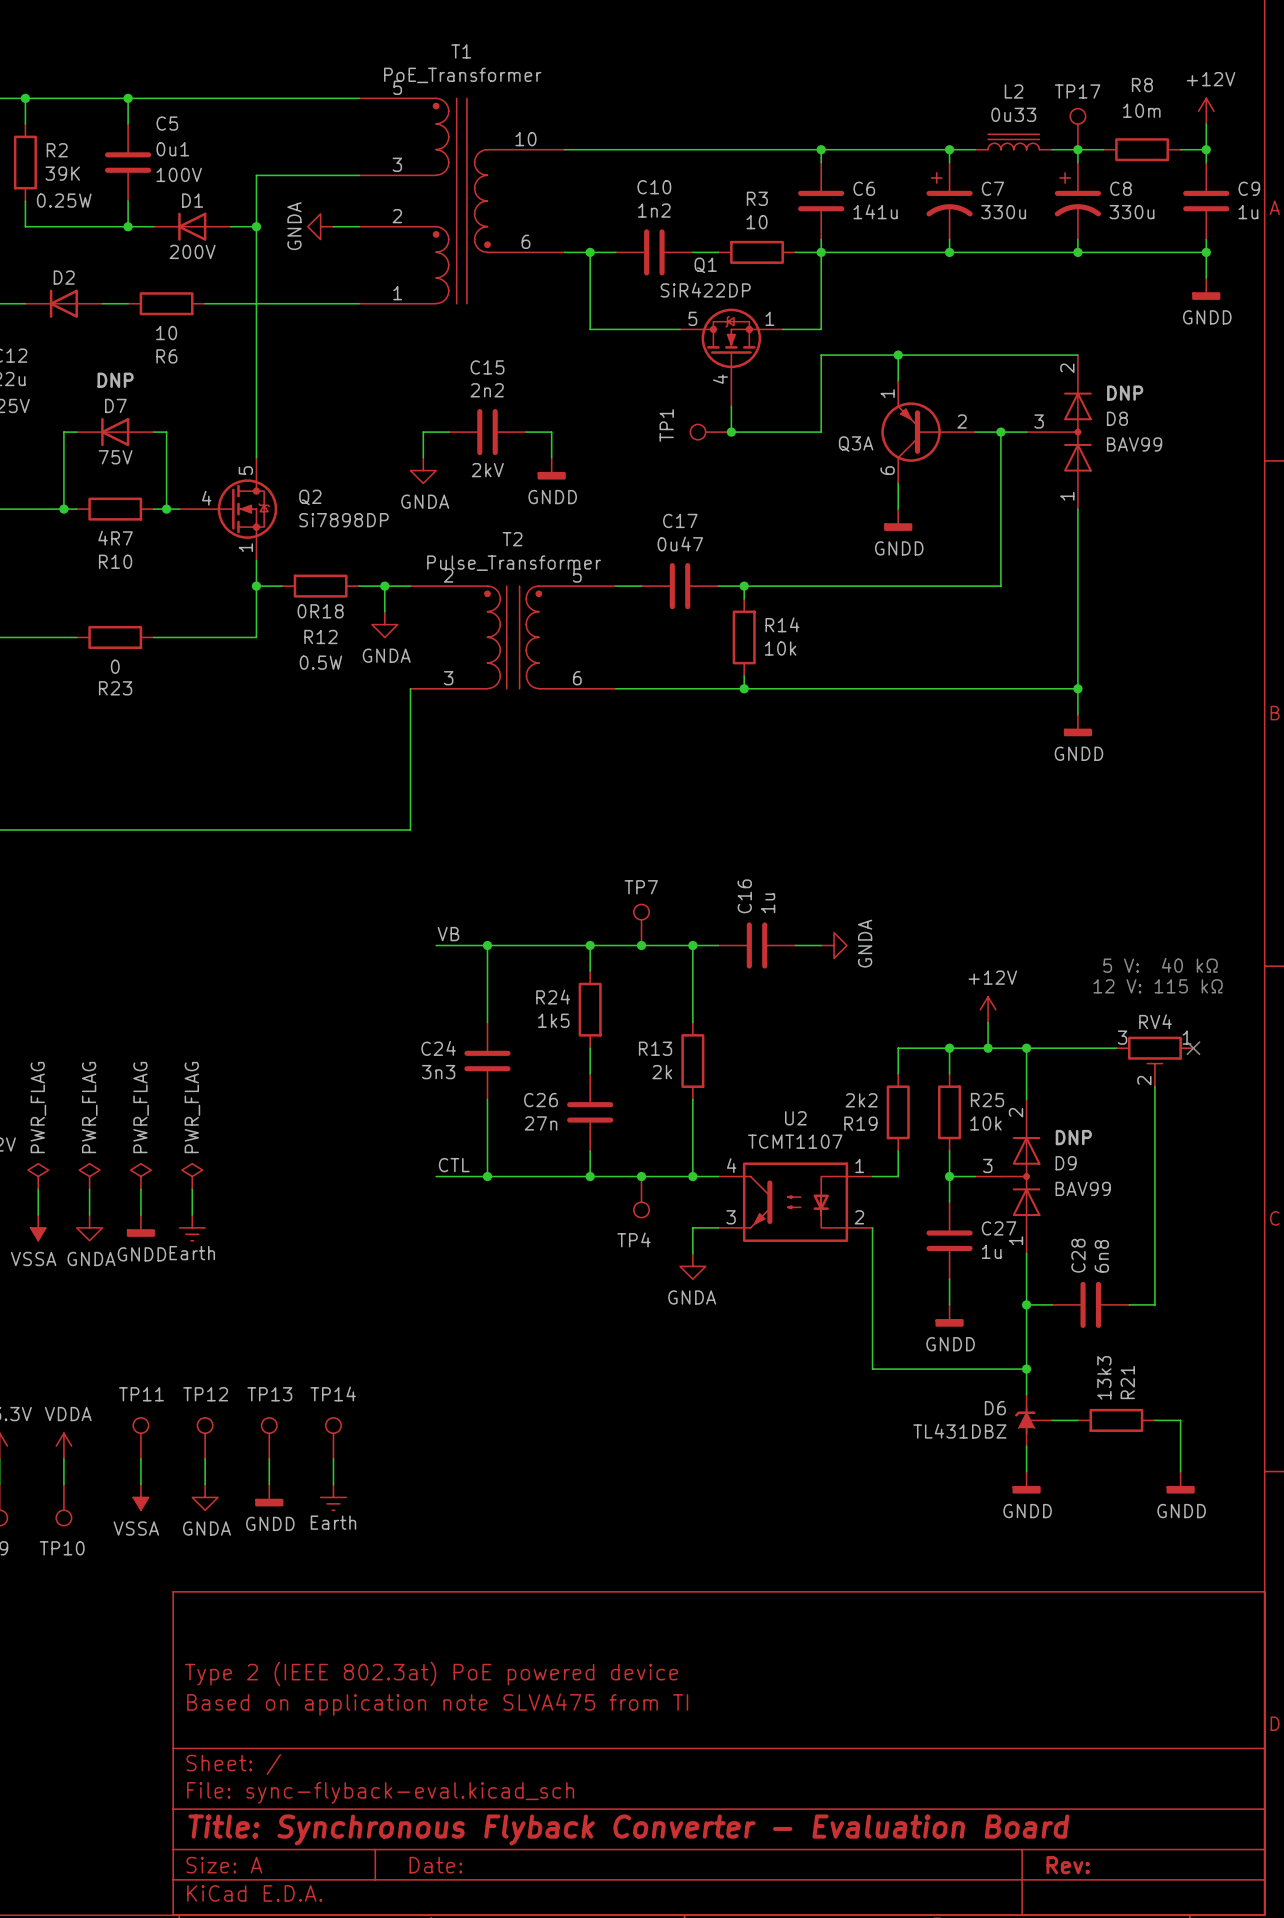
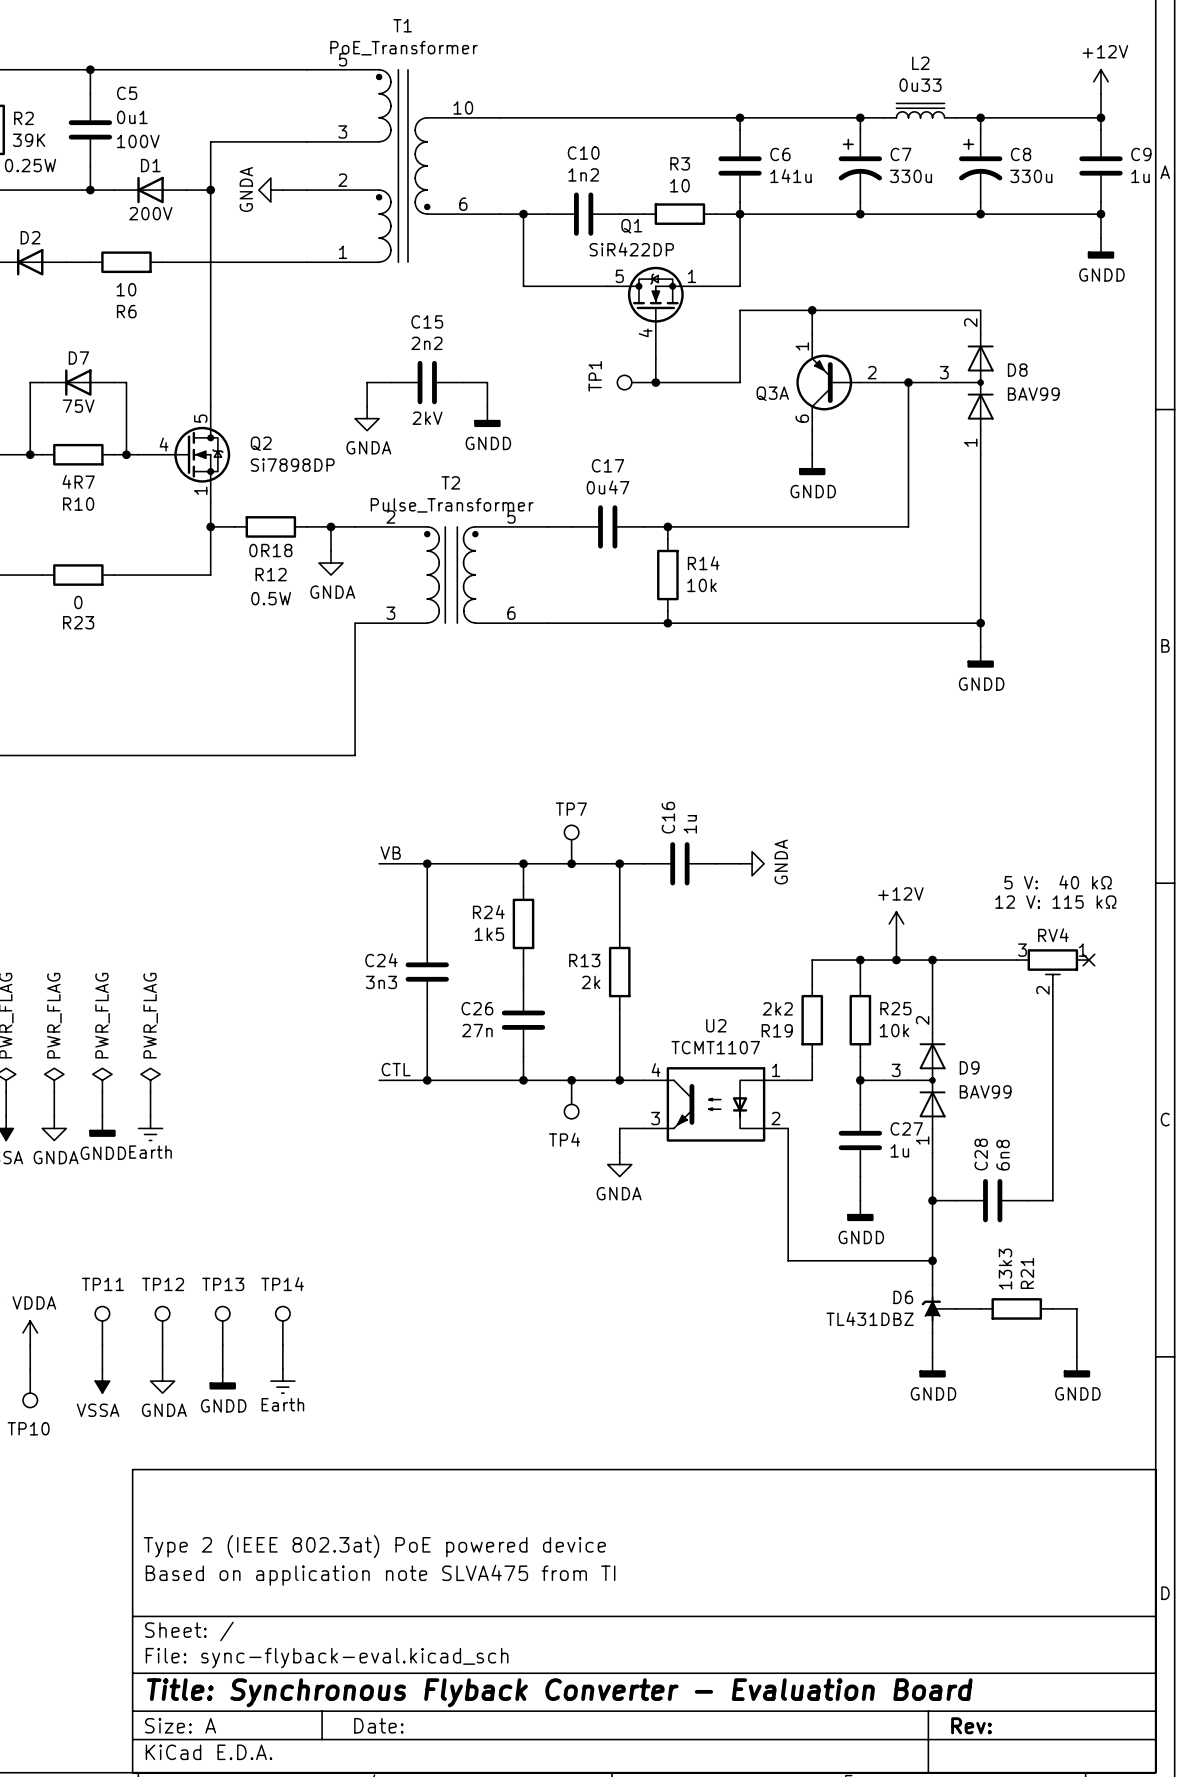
TP17: (1077, 129) -> none
wire: none -> (1004, 117) (1076, 117)
R8: 10m (1142, 149) -> none
D7 text: DNP (115, 380) -> none
D8 text: DNP (1125, 393) -> none
D9 text: DNP (1073, 1137) -> none

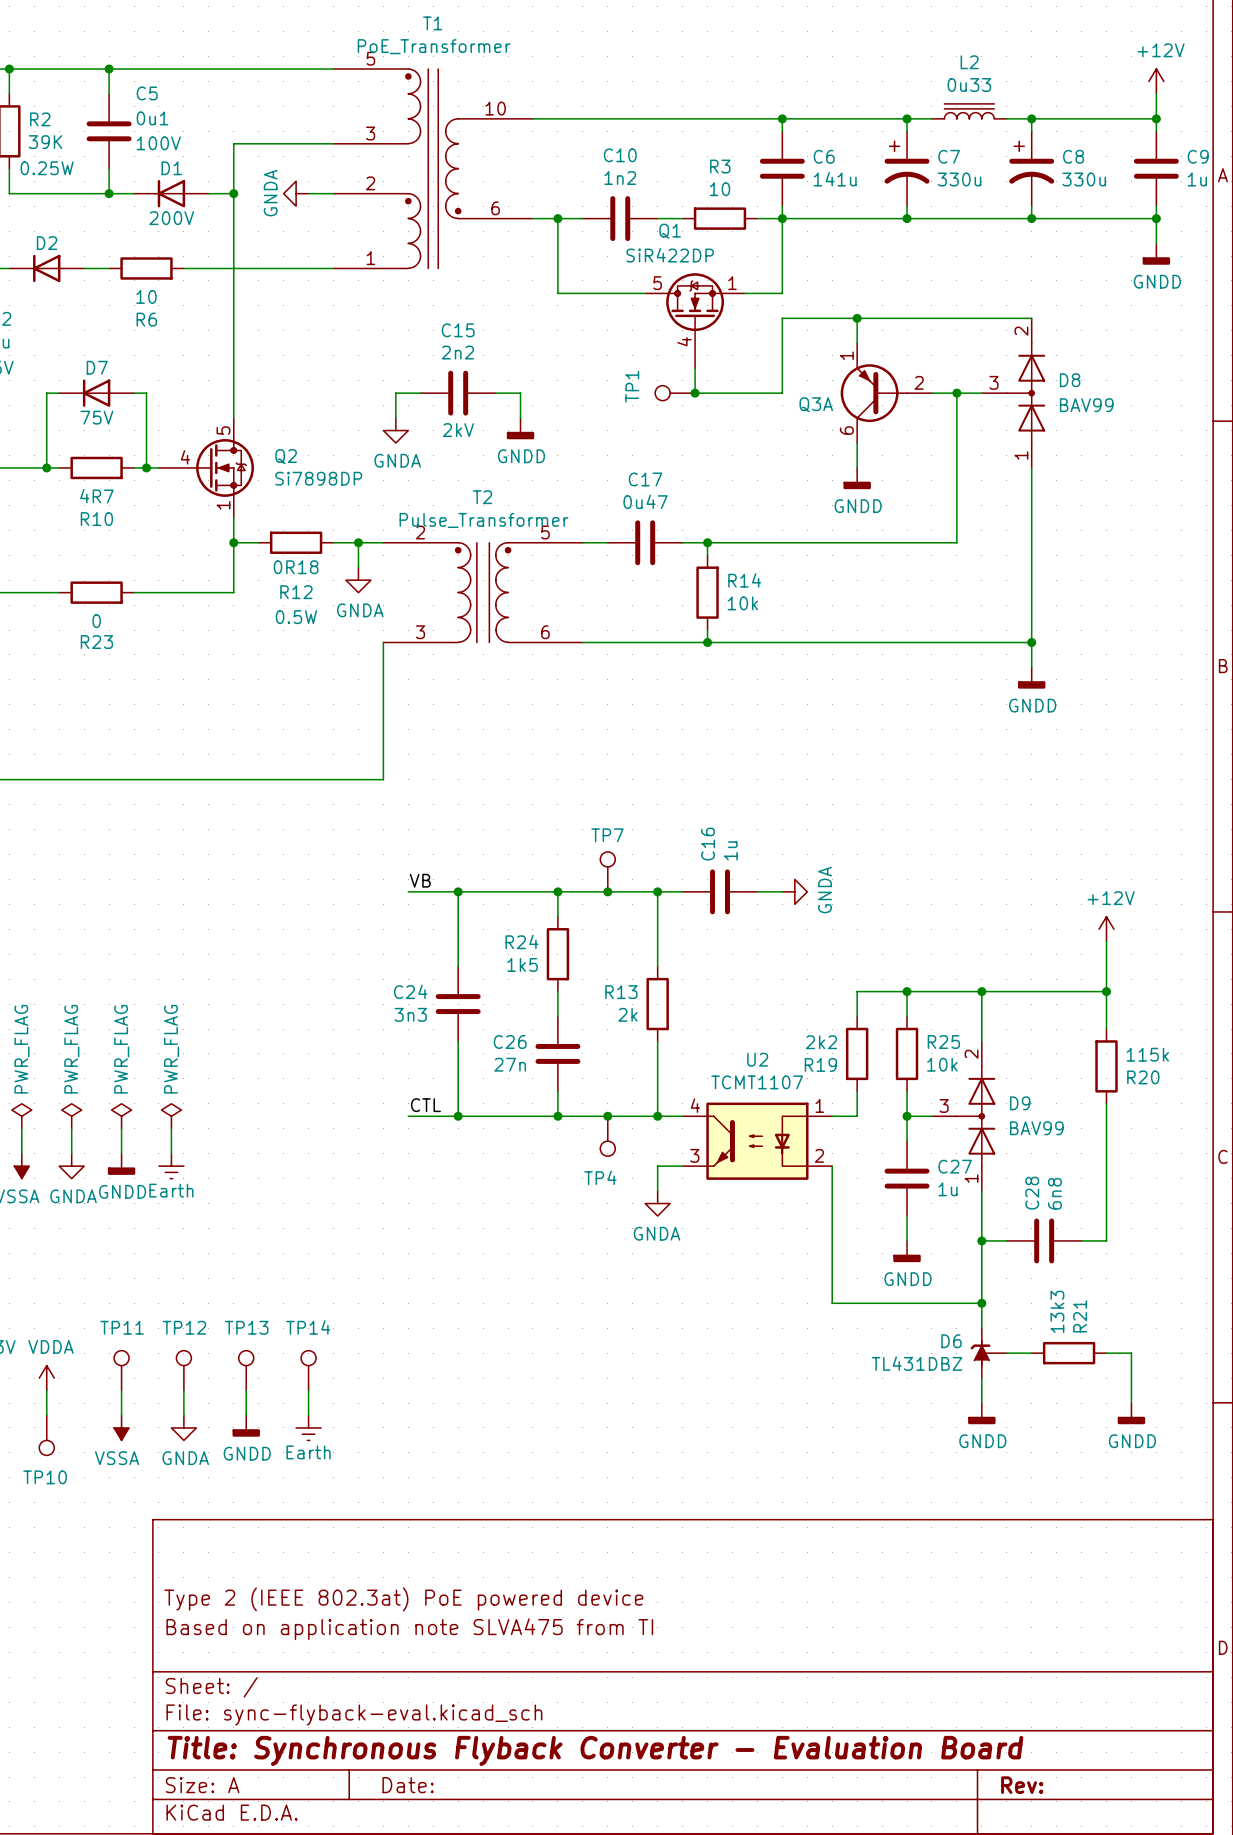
text: 5 V: 40 kΩ (1058, 882) -> none
text: 12 V: 115 kΩ (1055, 902) -> none
power symbol position: +12V (896, 923) -> +12V (1106, 929)
wire: (896, 935) (896, 960) -> none
junction: (896, 960) -> none
wire: none -> (1069, 991) (1106, 991)
junction: none -> (1106, 991)
no-connect mark: (1088, 960) -> none
RV4: (1052, 972) -> none
wire: (1052, 996) (1052, 1068) -> (1106, 1029) (1106, 941)
R20: none -> 115k (1106, 1066)

